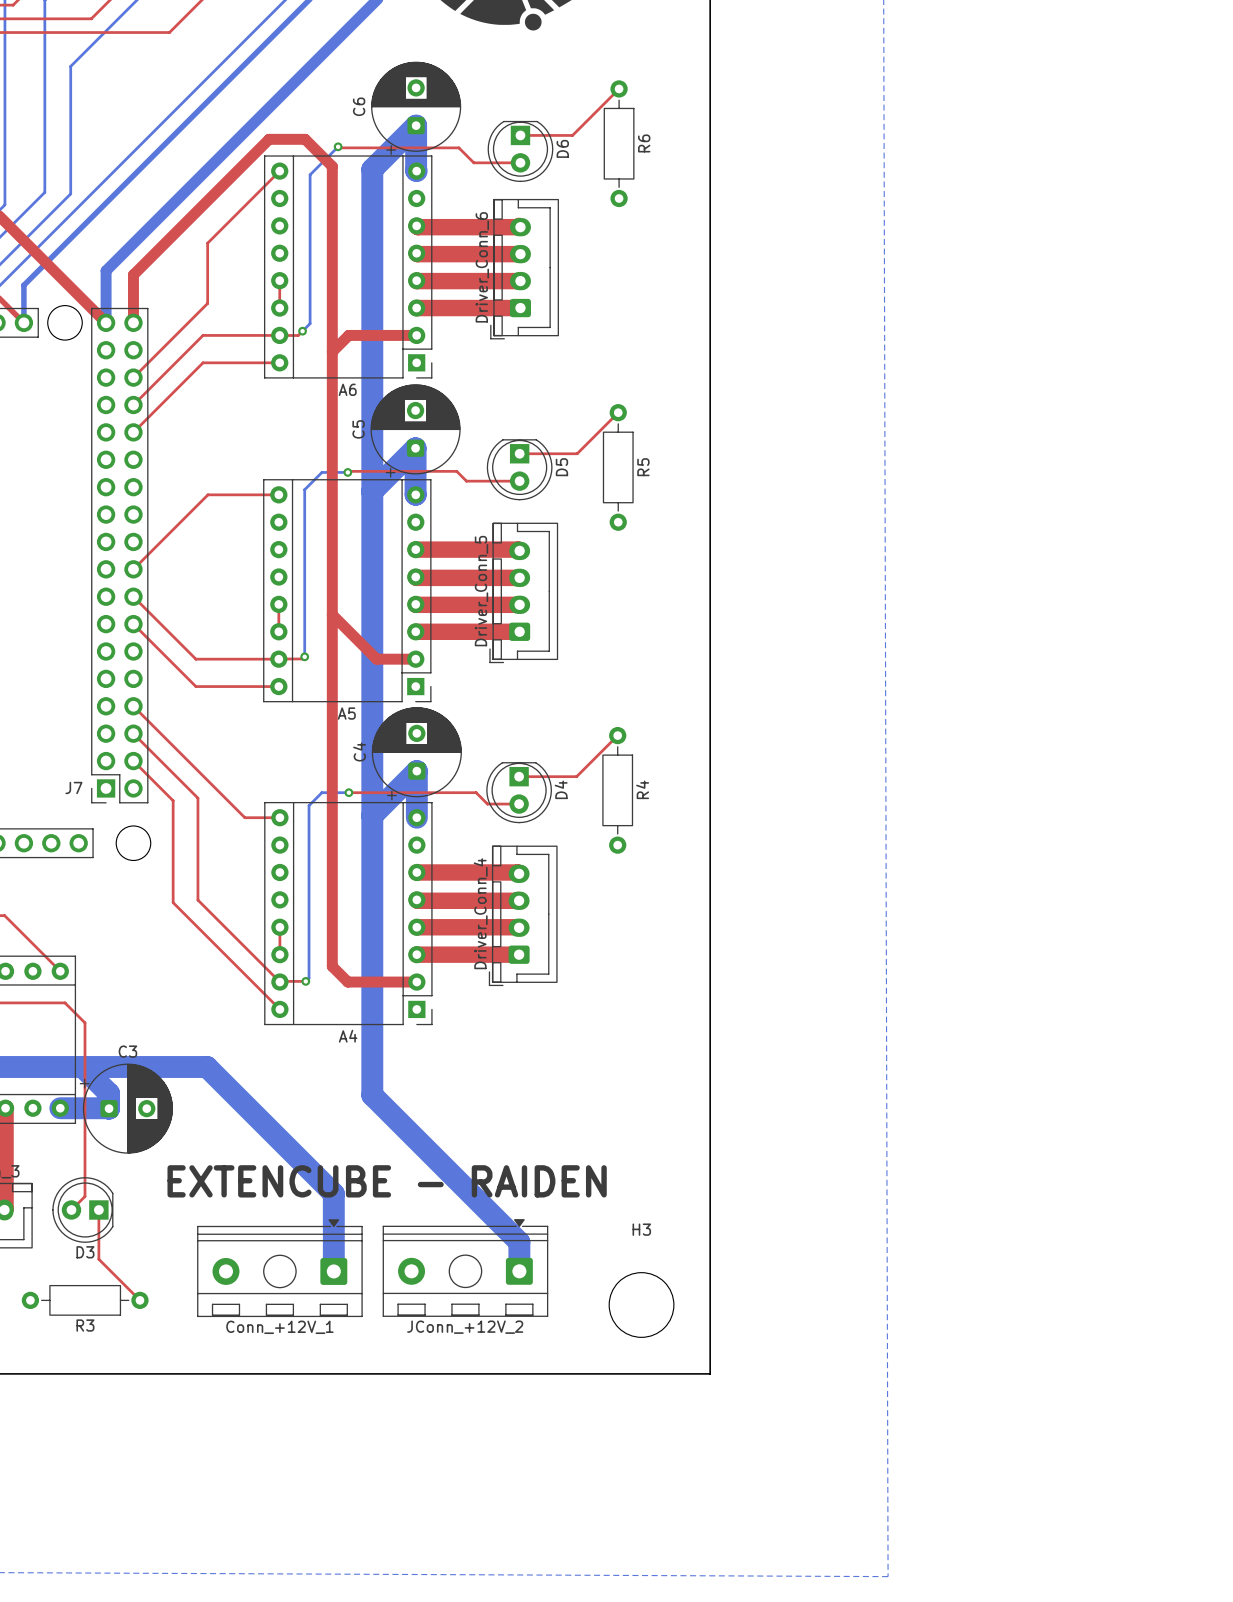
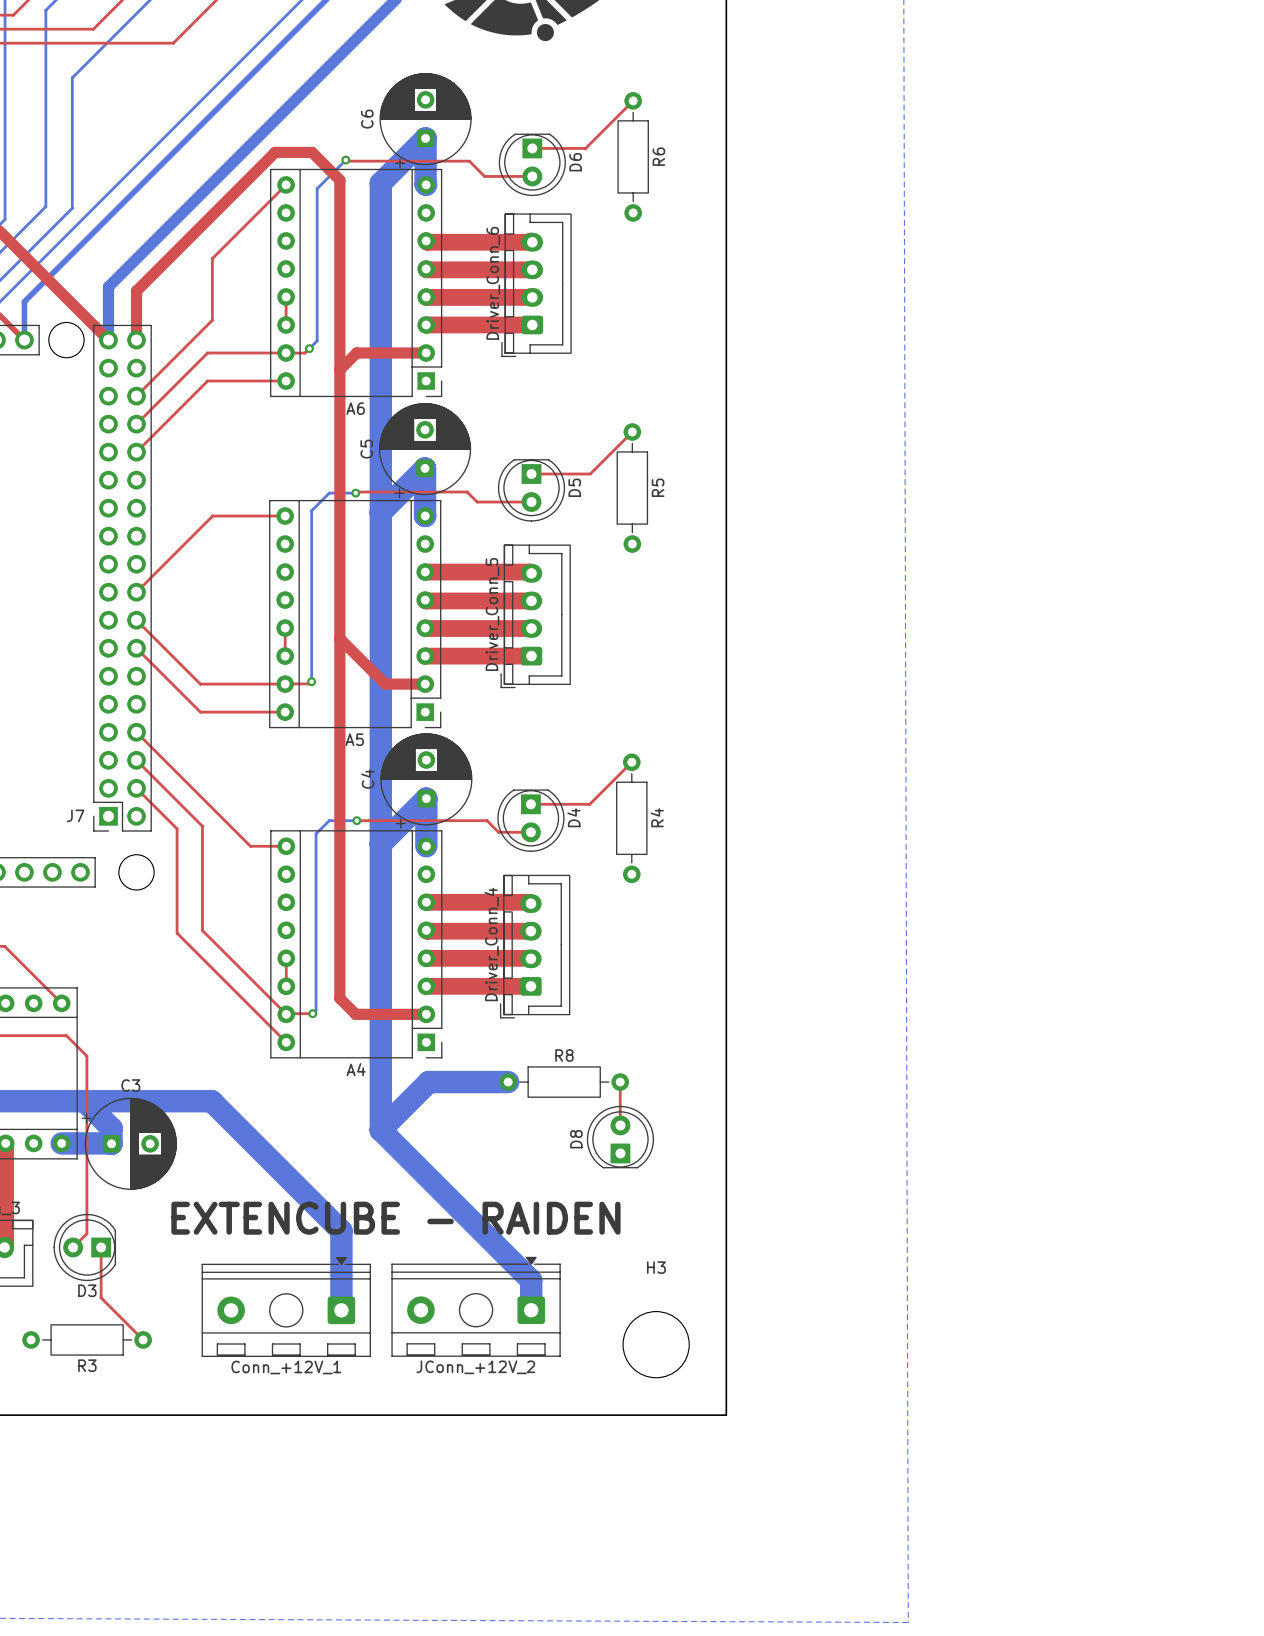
bottom track: none -> (508, 1082) (428, 1082) (380, 1130)
R8: none -> (564, 1082)
top track: none -> (620, 1082) (620, 1125)
D8: none -> (620, 1137)

